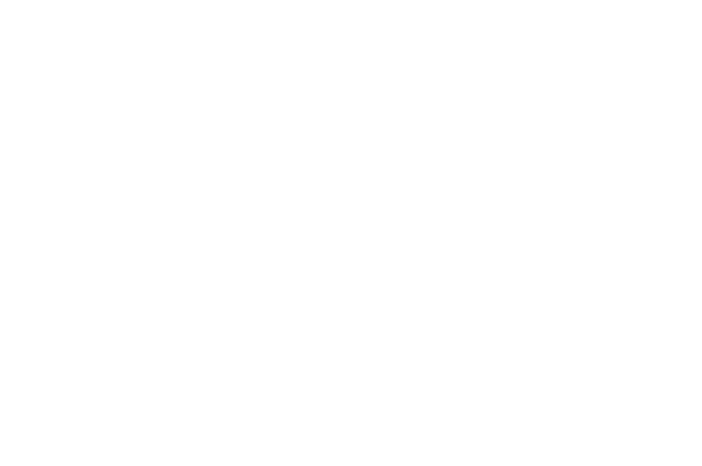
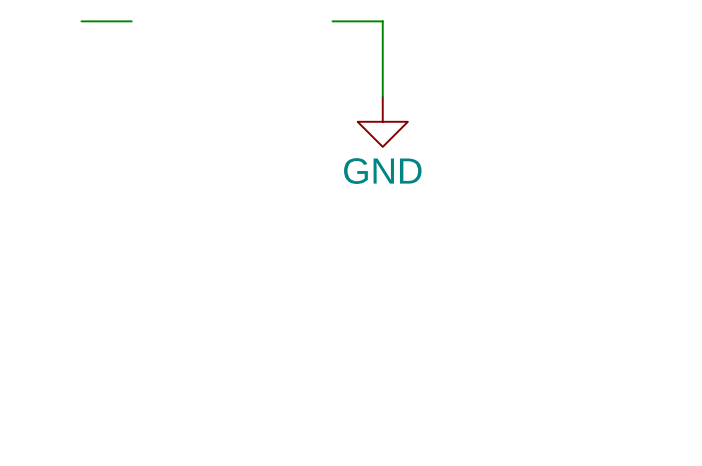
wire: none -> (81, 21) (131, 21)
wire: none -> (332, 21) (382, 21) (382, 96)
power symbol: none -> GND (382, 121)

